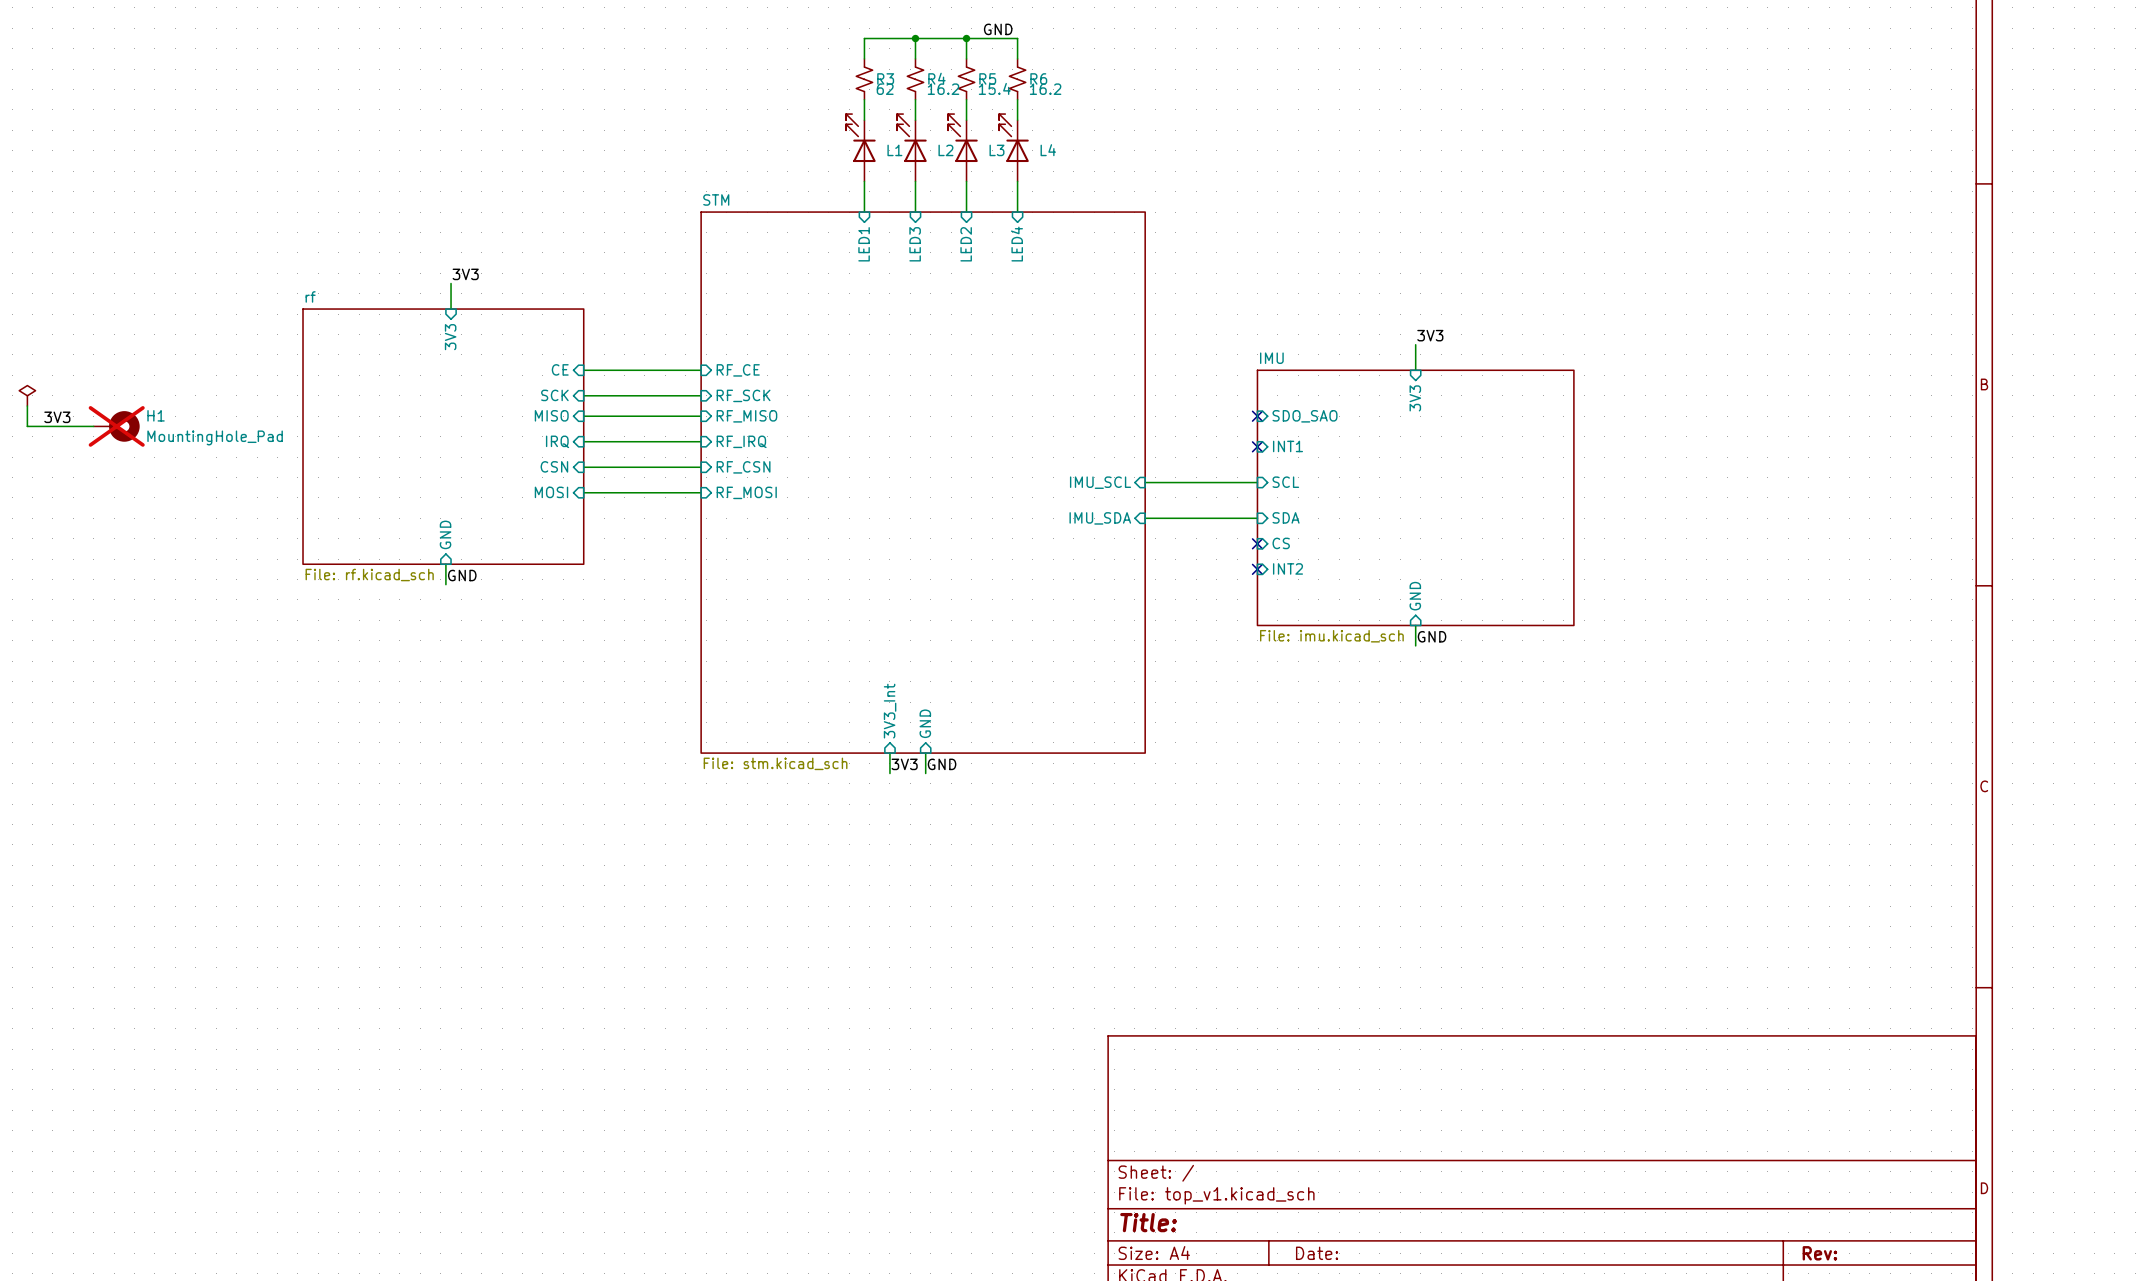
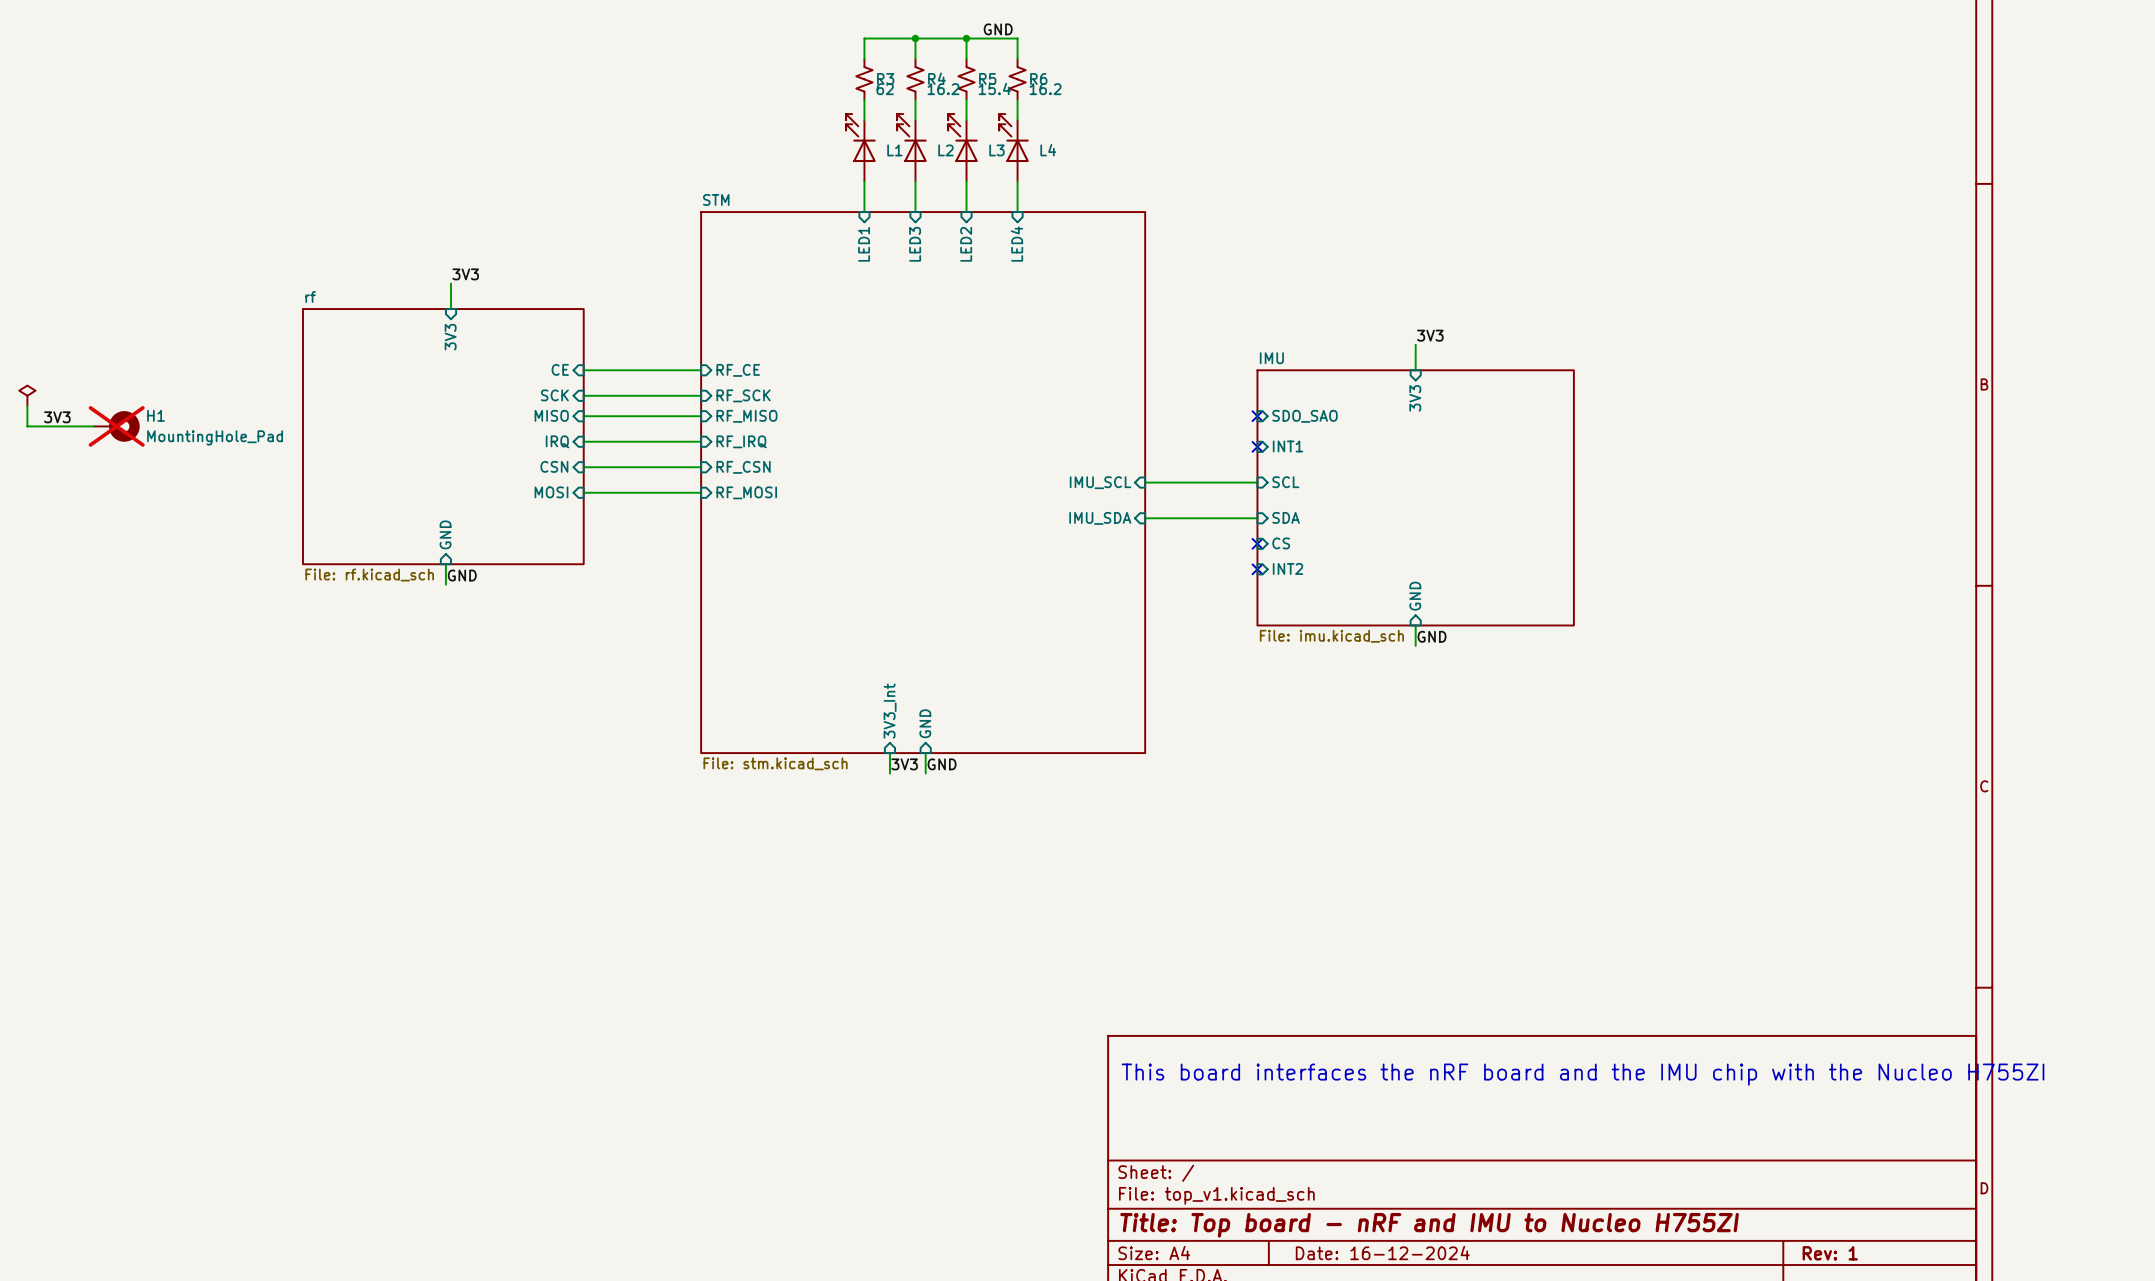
text: none -> This board interfaces the nRF board and the IMU chip with the Nucleo H755ZI (1583, 1074)
title block: Title: (1148, 1222) -> Title: Top board - nRF and IMU to Nucleo H755ZI (1429, 1225)
title block: Date: (1317, 1253) -> Date: 16-12-2024 (1382, 1253)
title block: Rev: (1819, 1253) -> Rev: 1 (1830, 1253)

